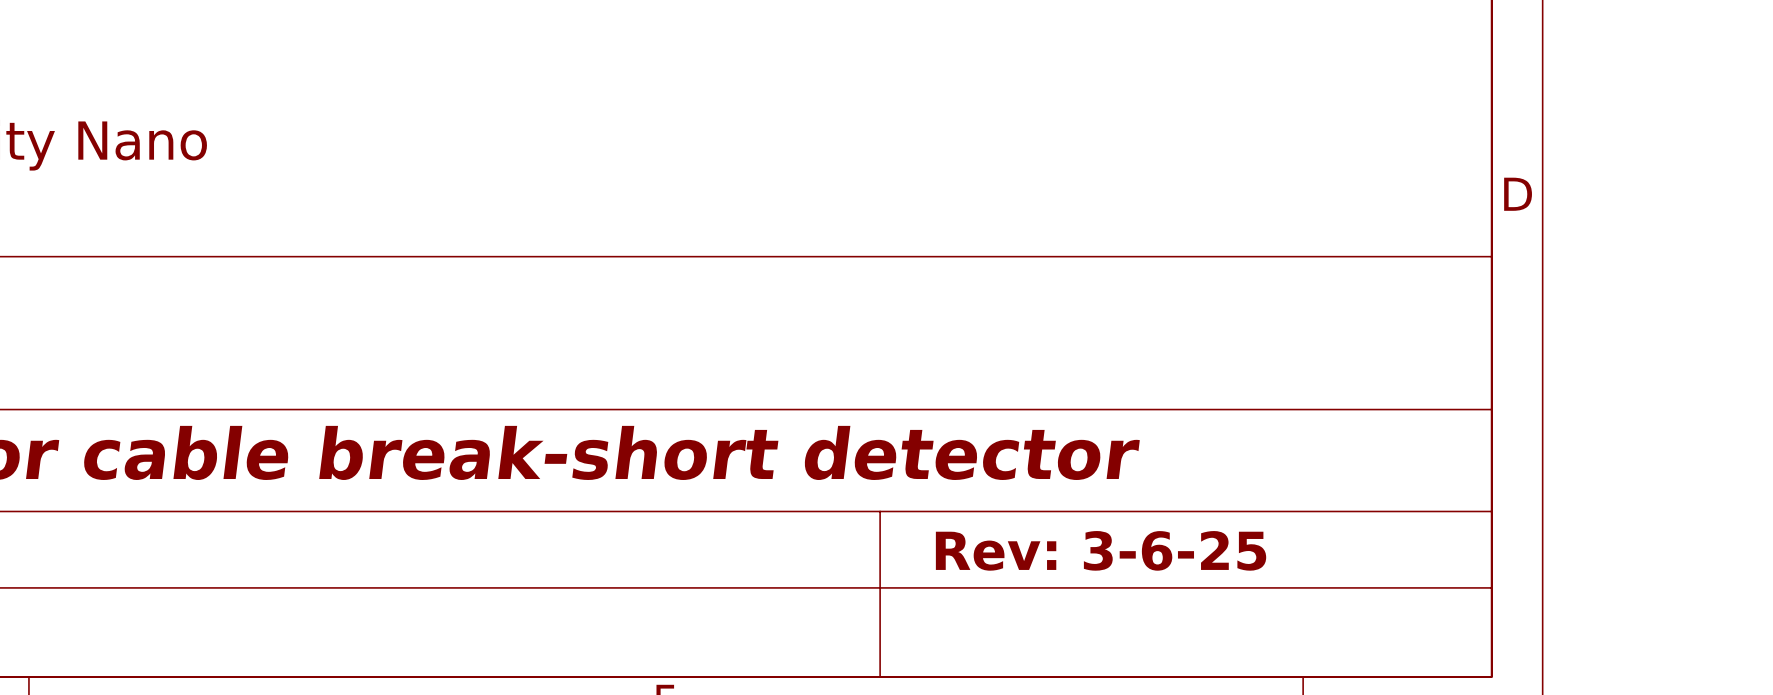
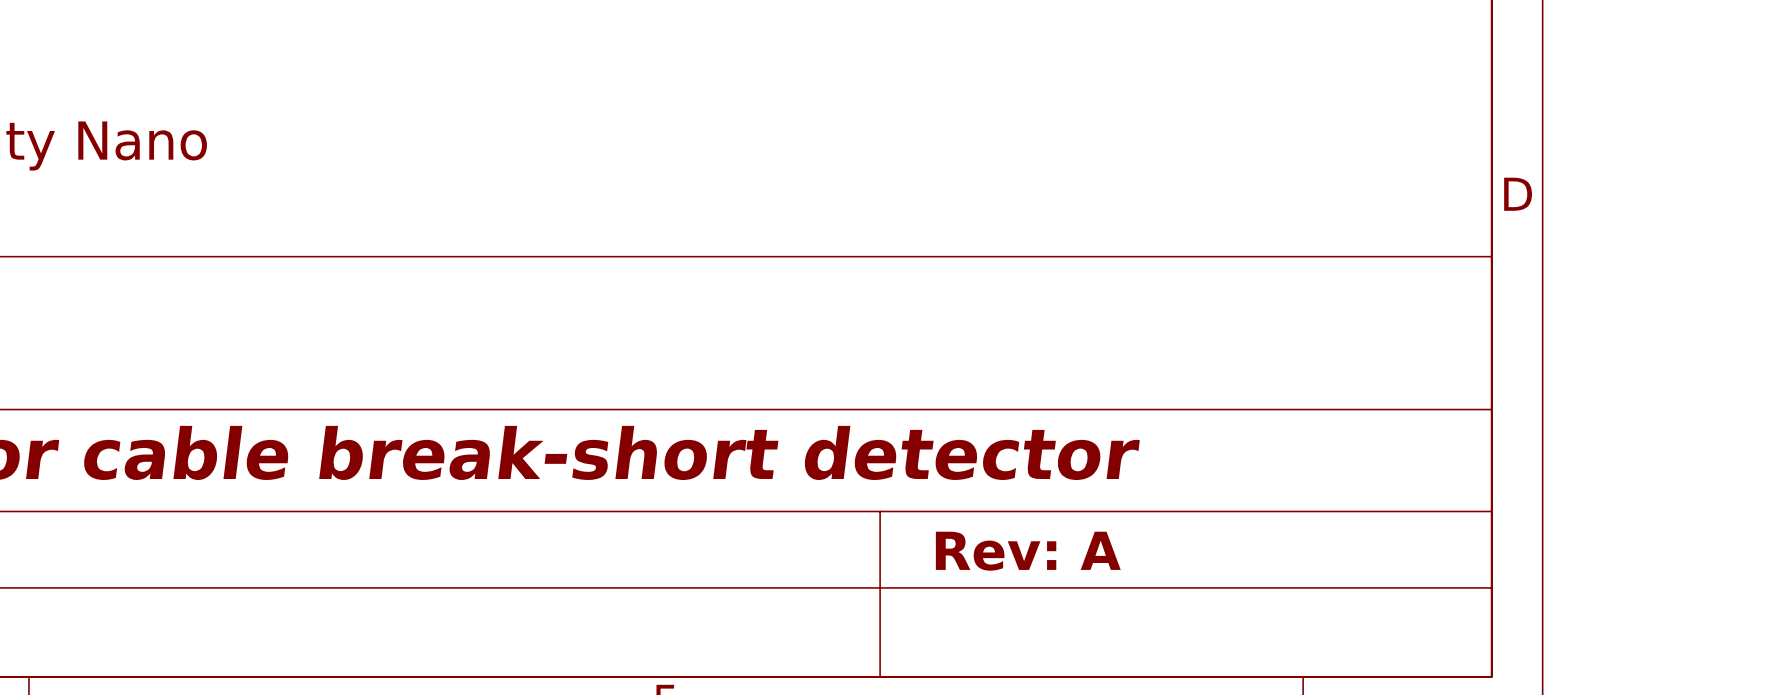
title block: Rev: 3-6-25 (1101, 550) -> Rev: A (1028, 551)

